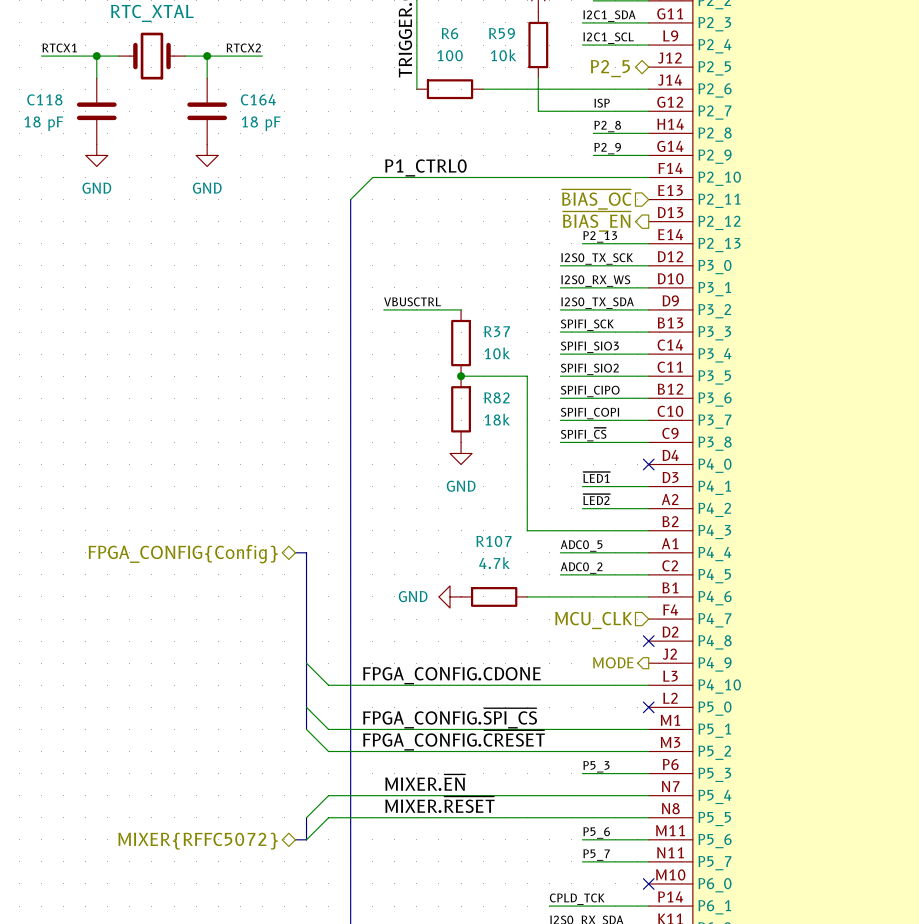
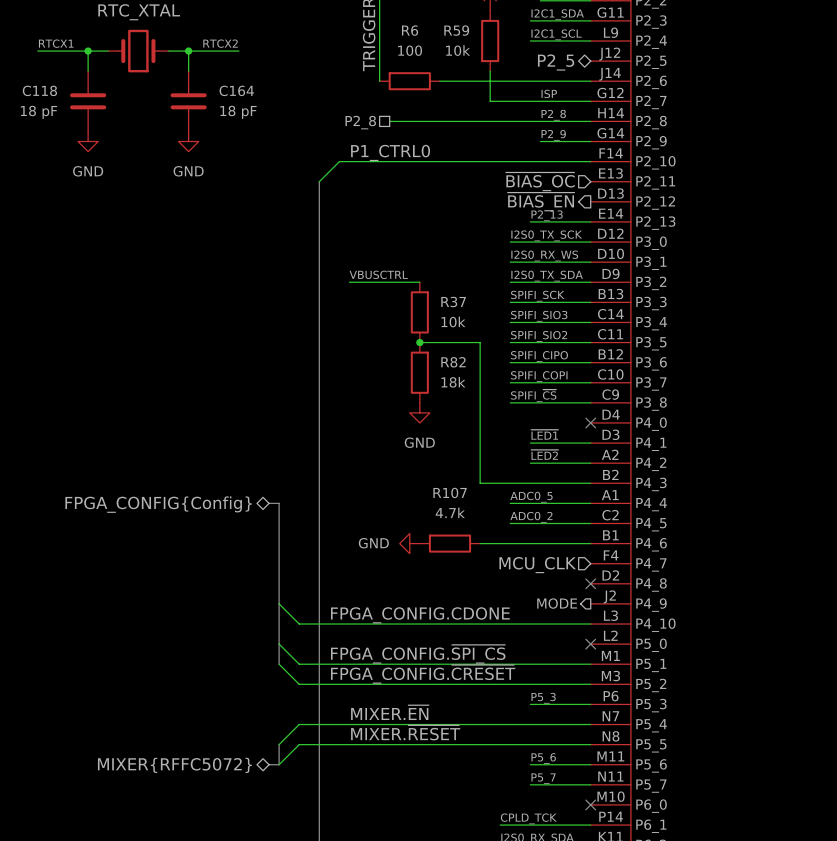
wire: none -> (389, 121) (540, 121)
hierarchical label: none -> P2_8 (360, 122)

